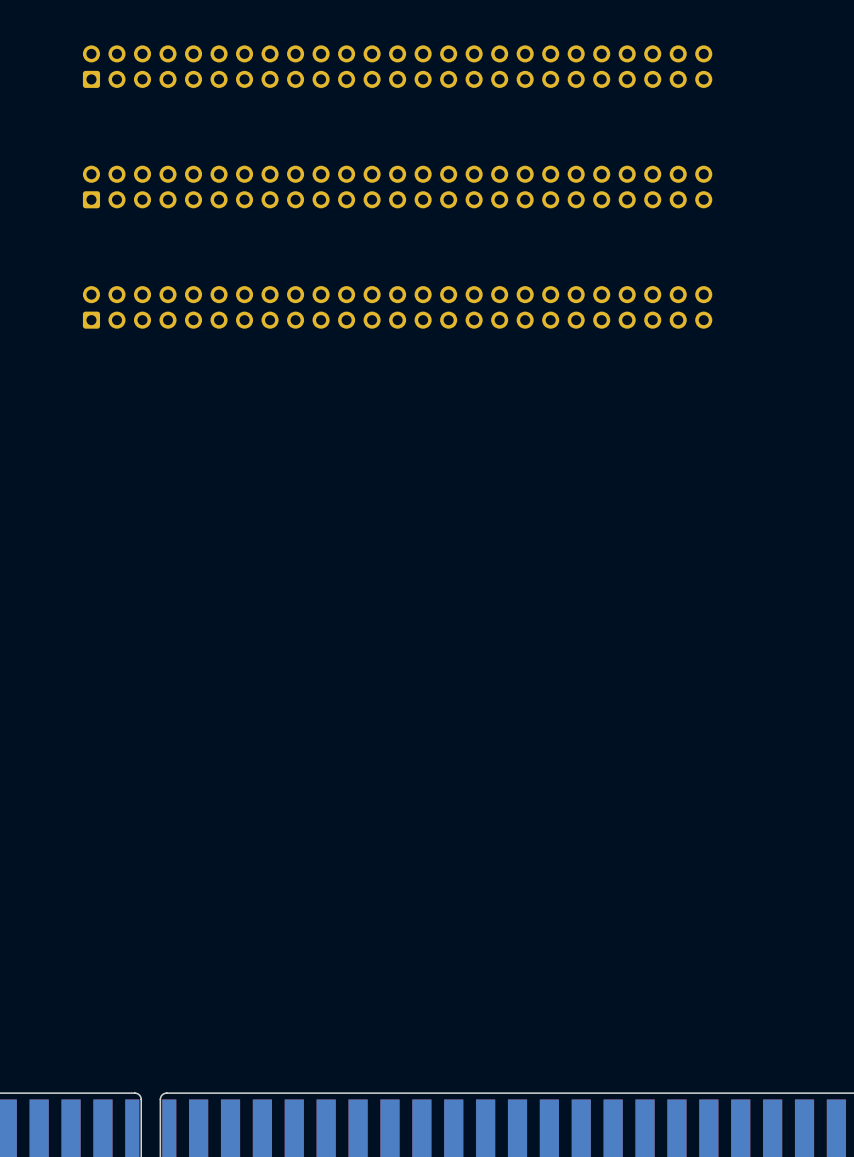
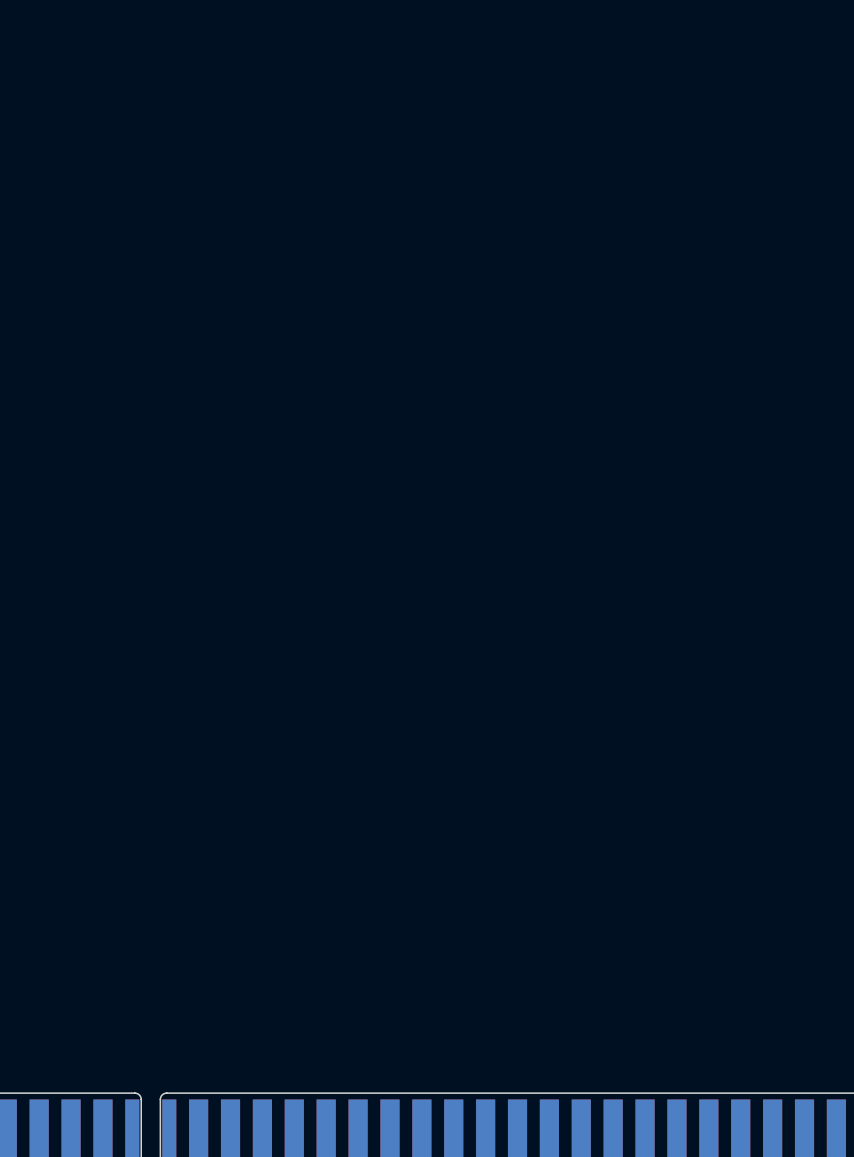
part: (397, 66) -> none
part: (397, 187) -> none
part: (397, 307) -> none

